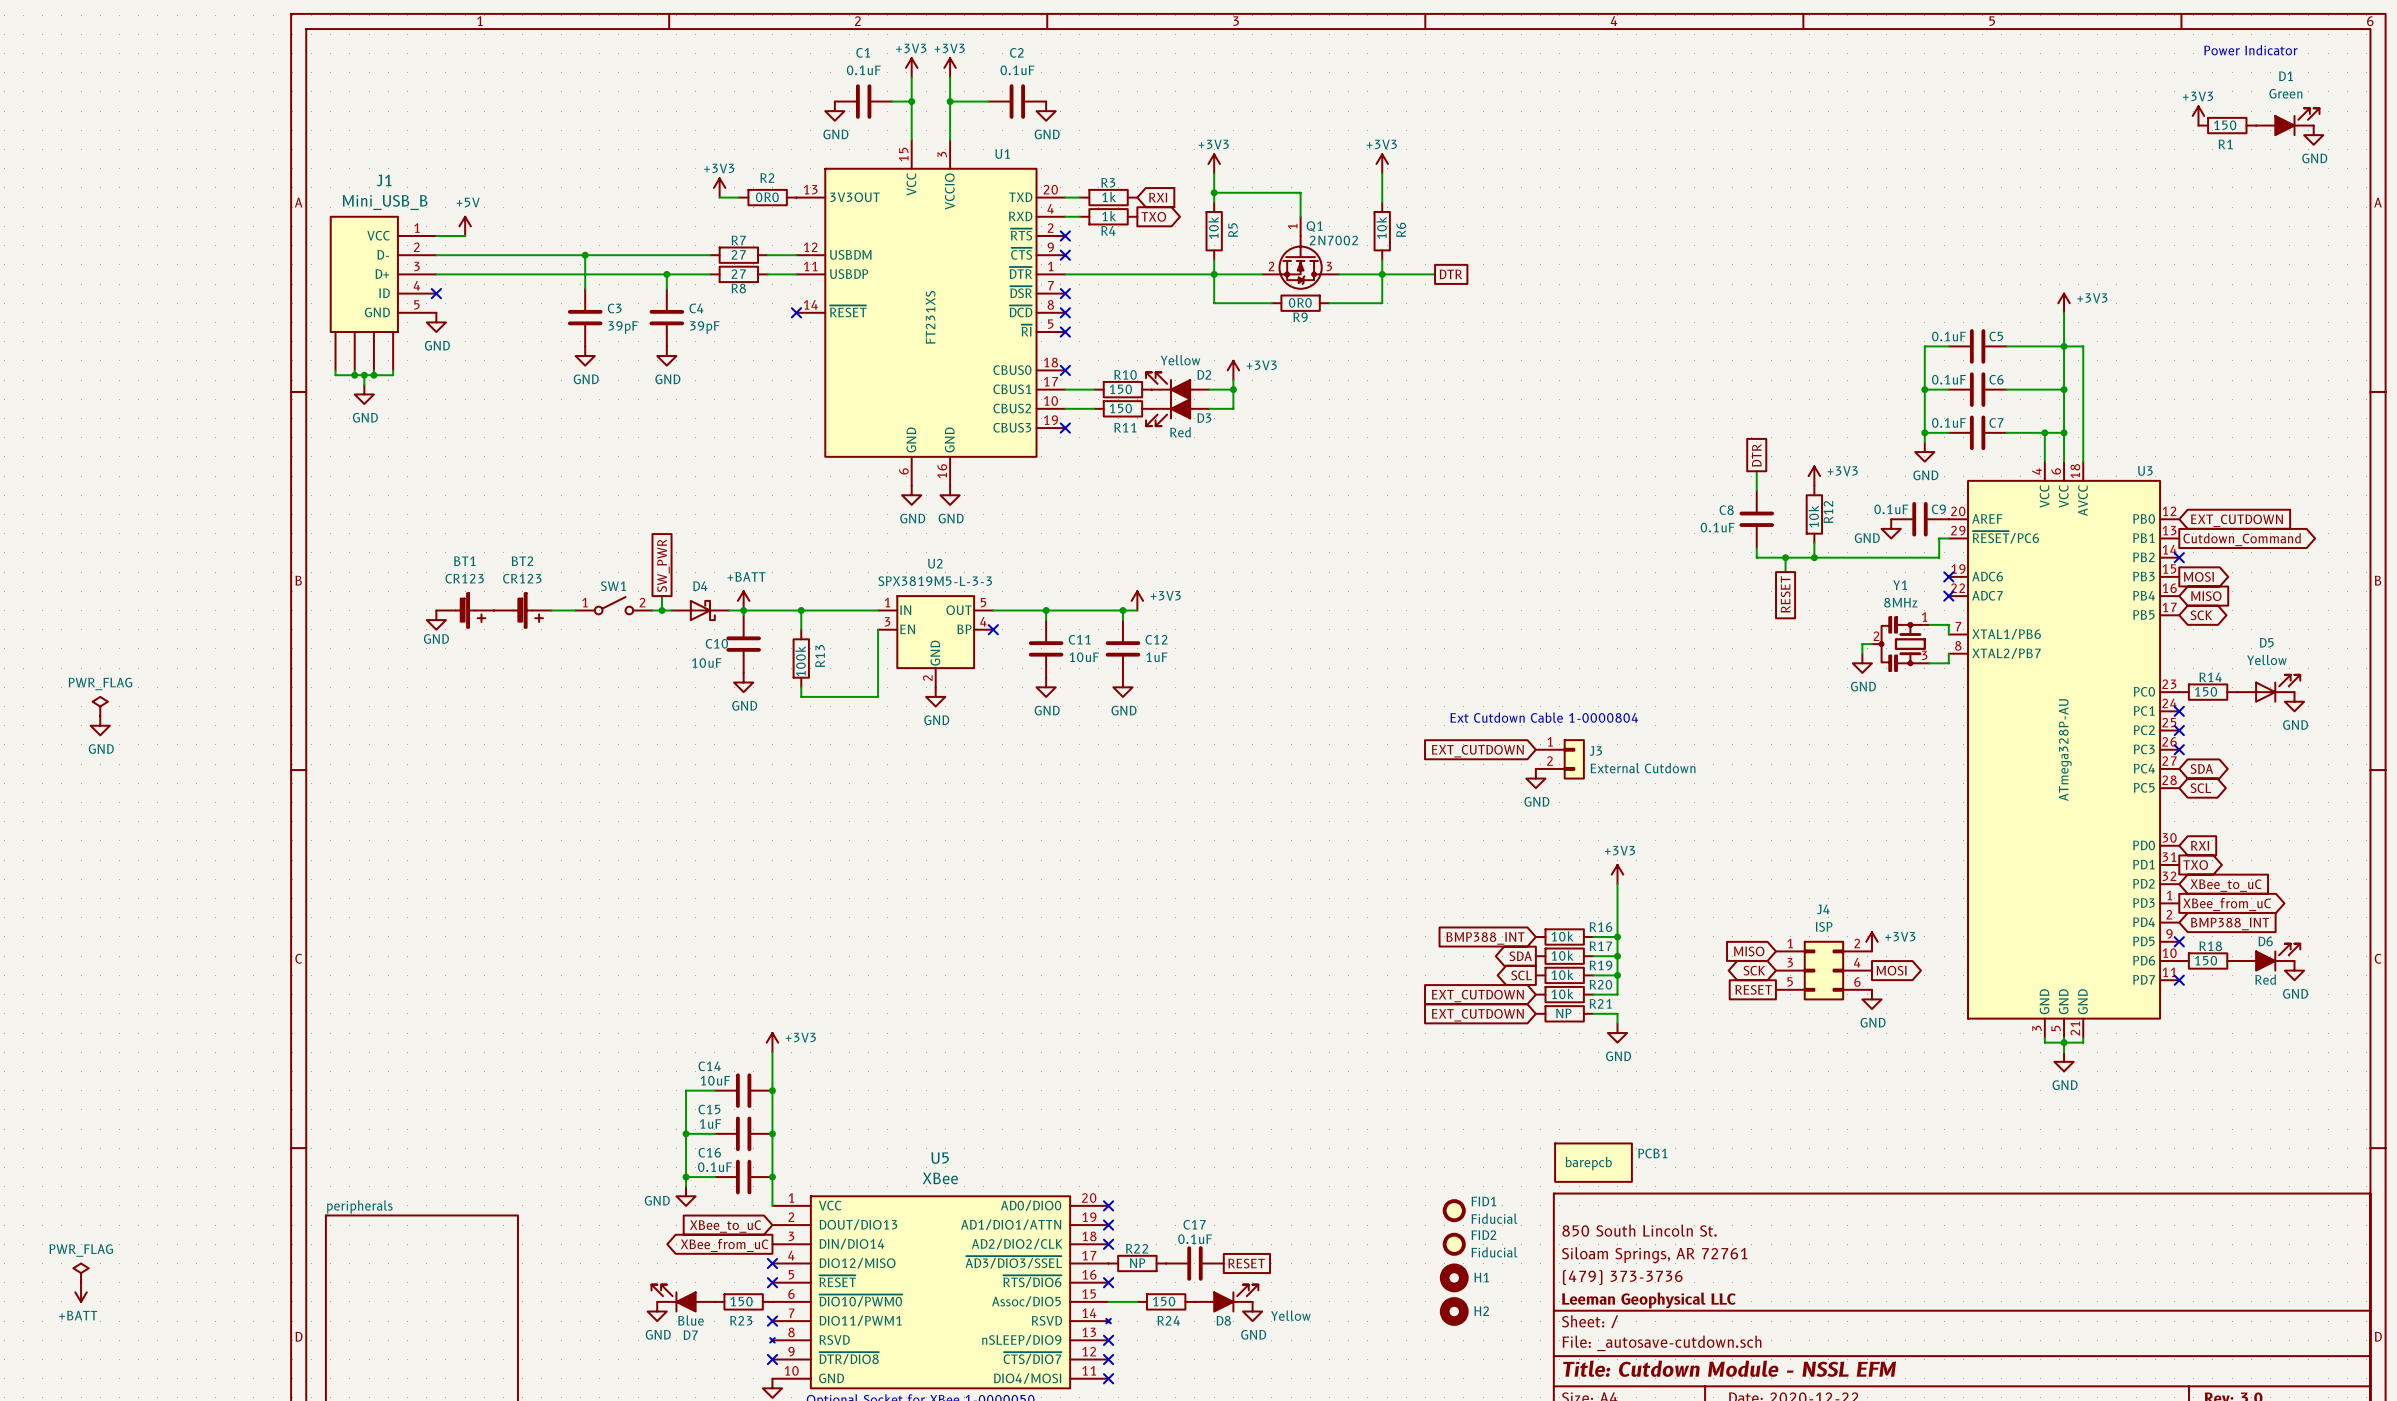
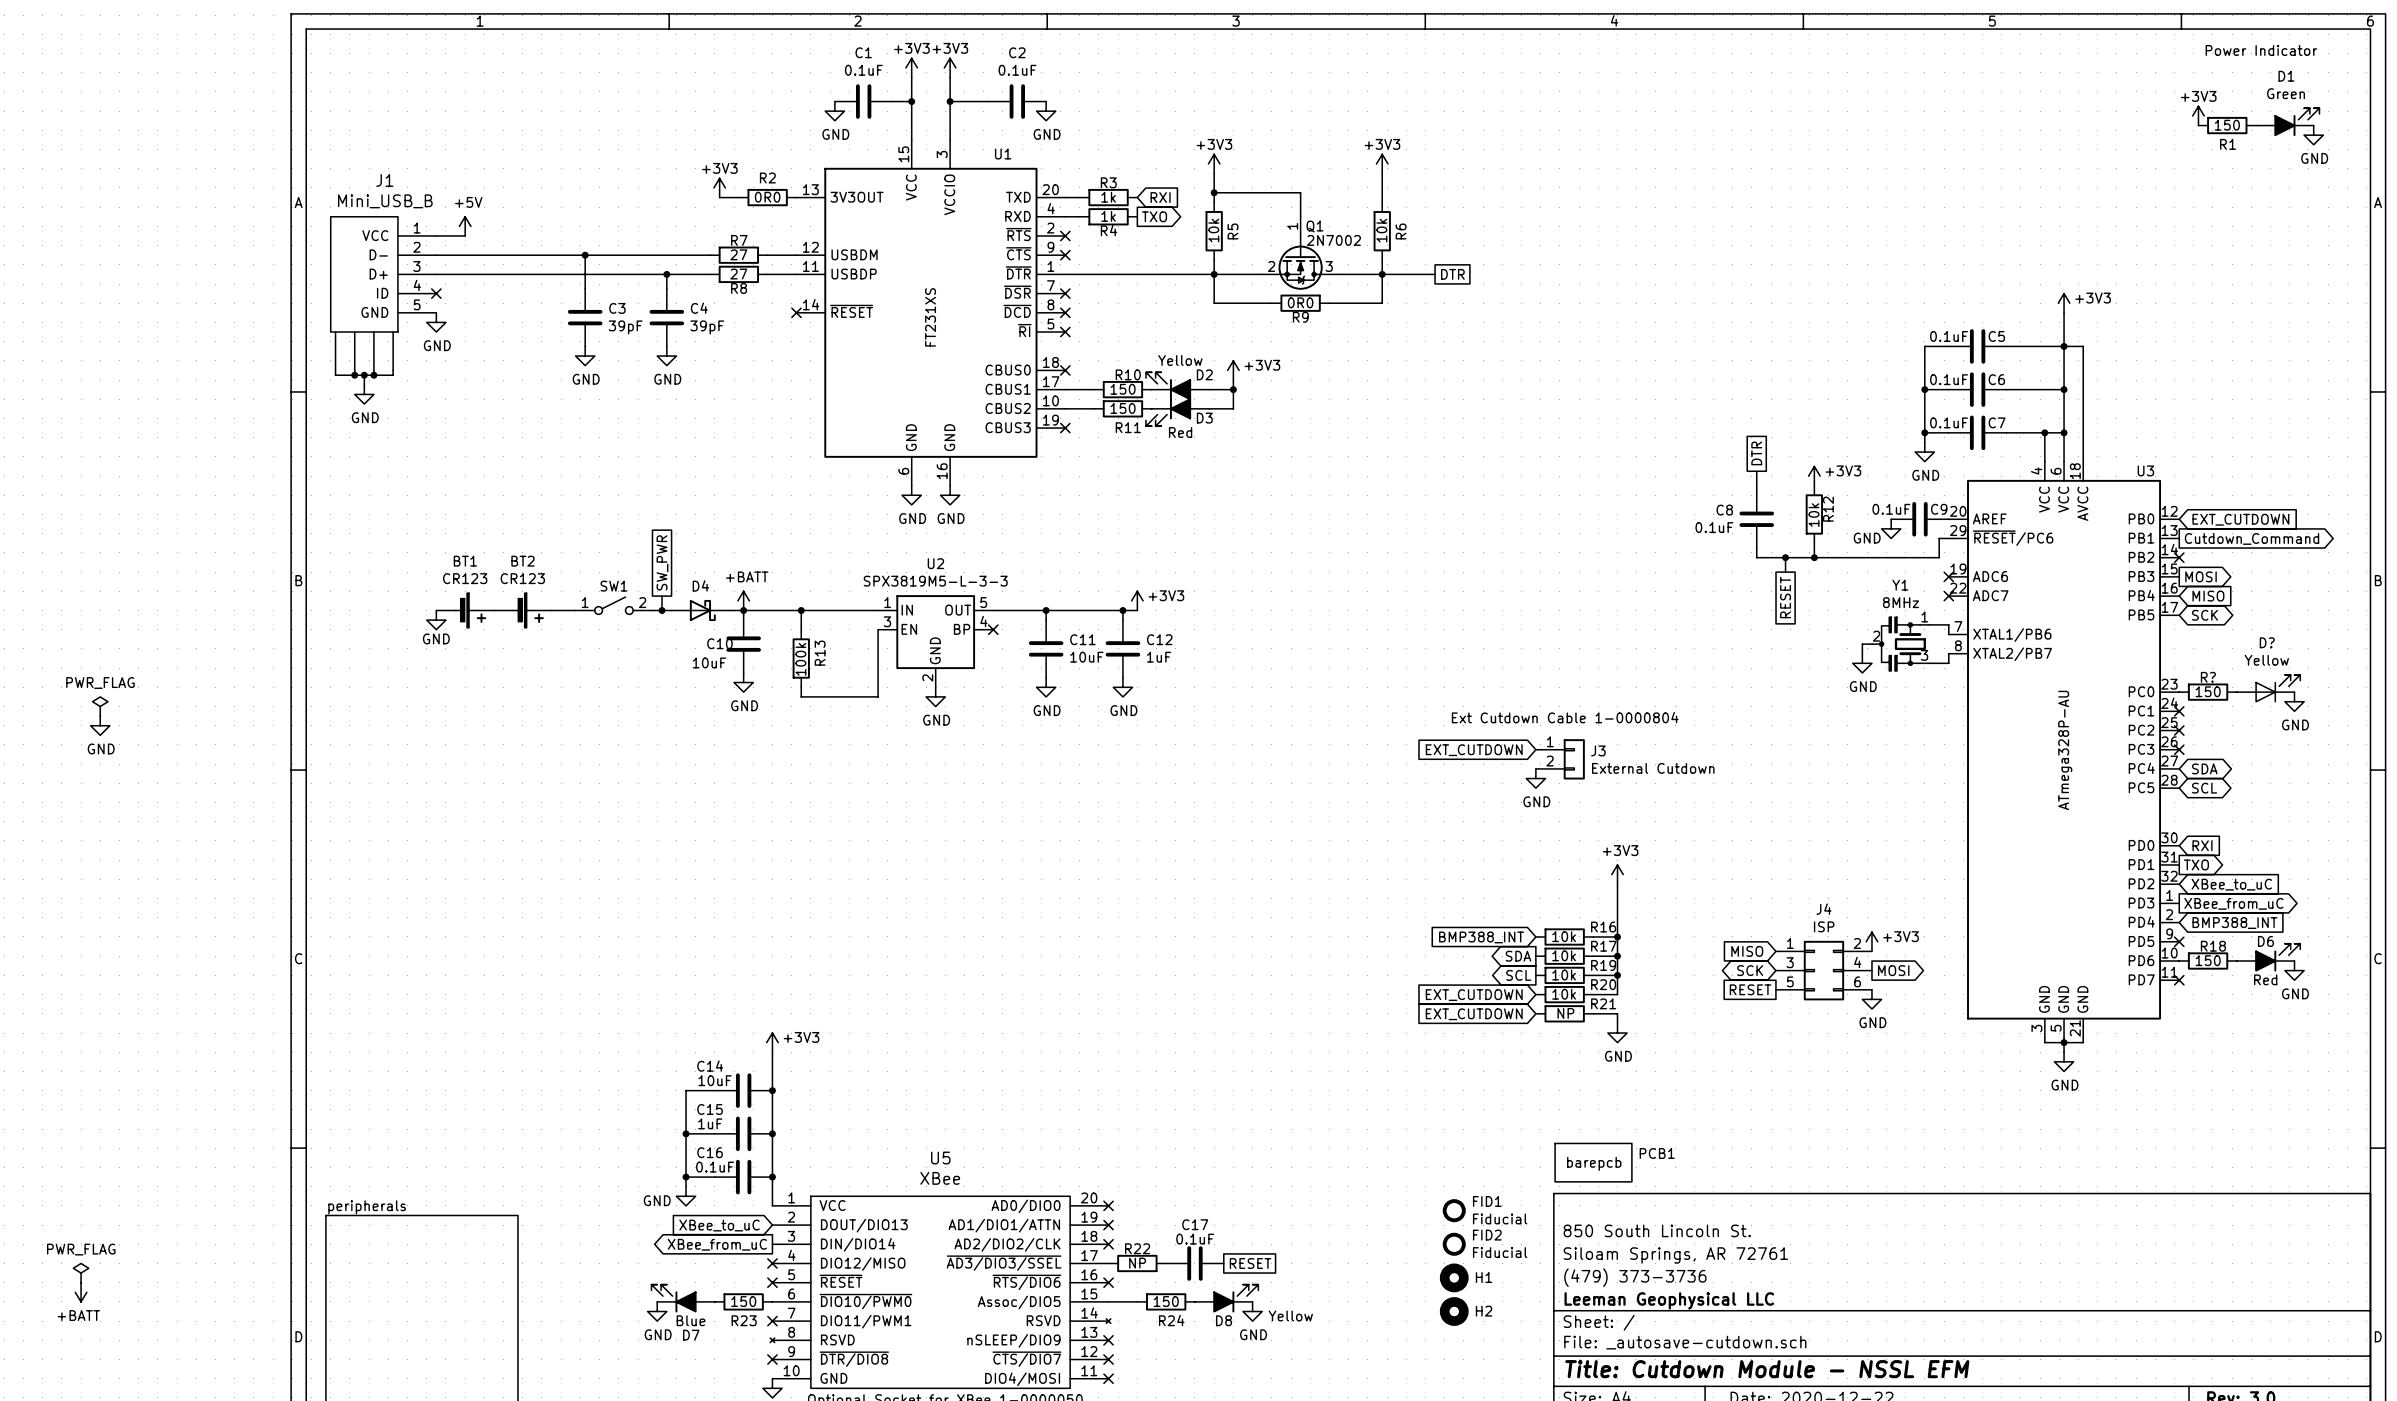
D5 name: D5 (2266, 642) -> D? (2267, 642)
R14 name: R14 (2210, 677) -> R? (2208, 677)

